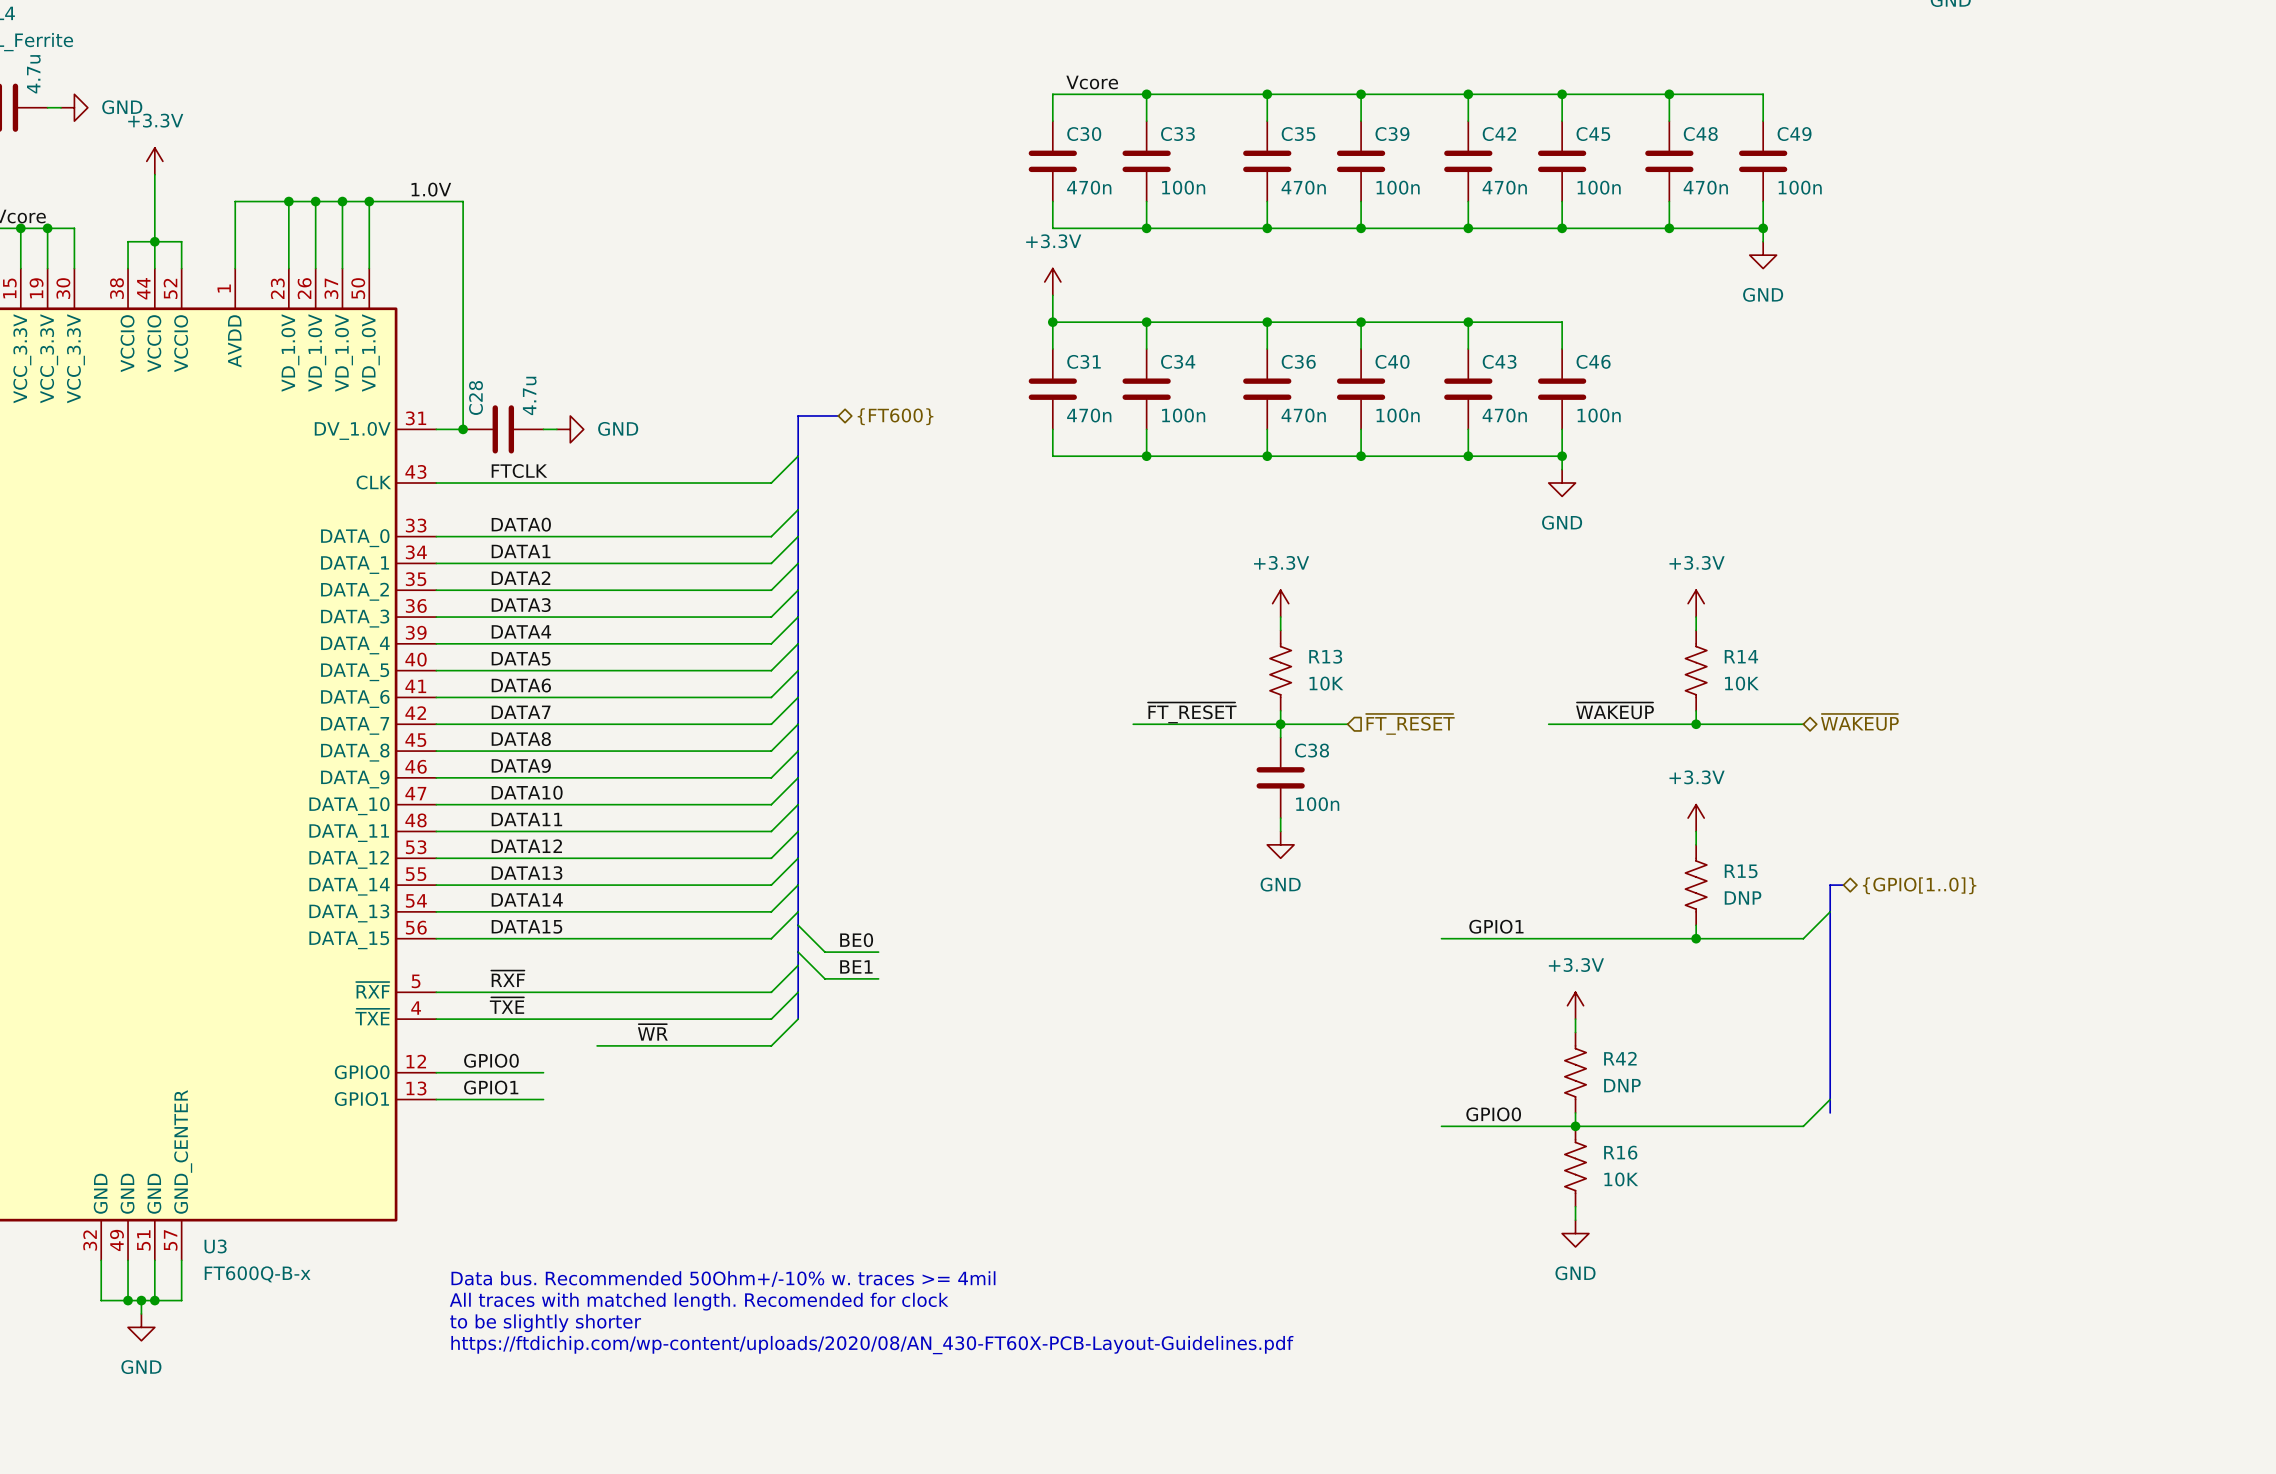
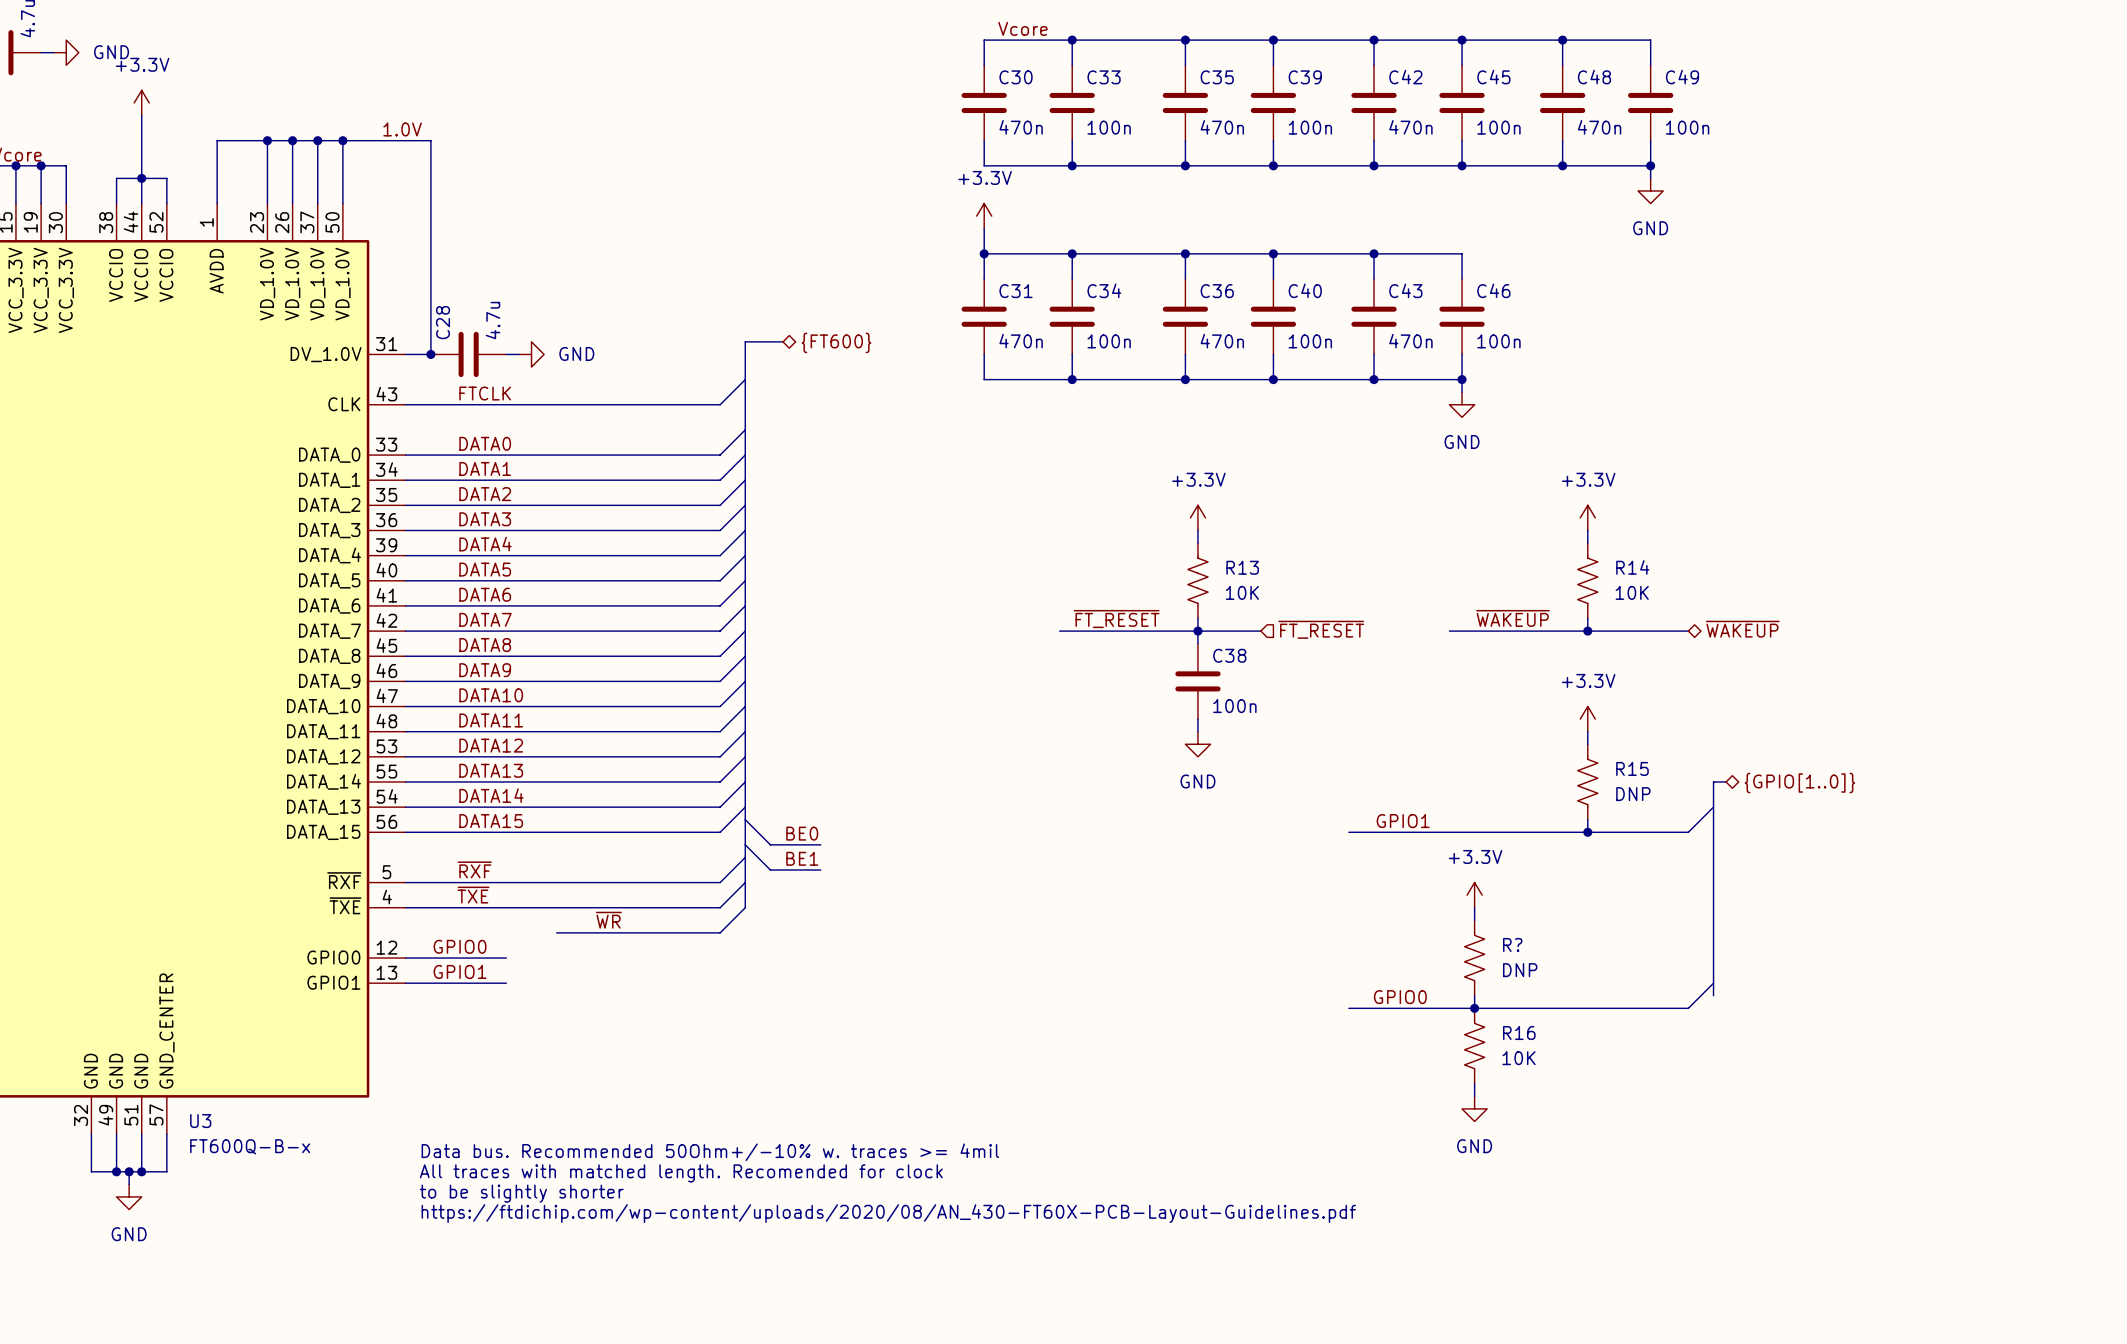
R42 name: R42 (1620, 1058) -> R? (1512, 944)

